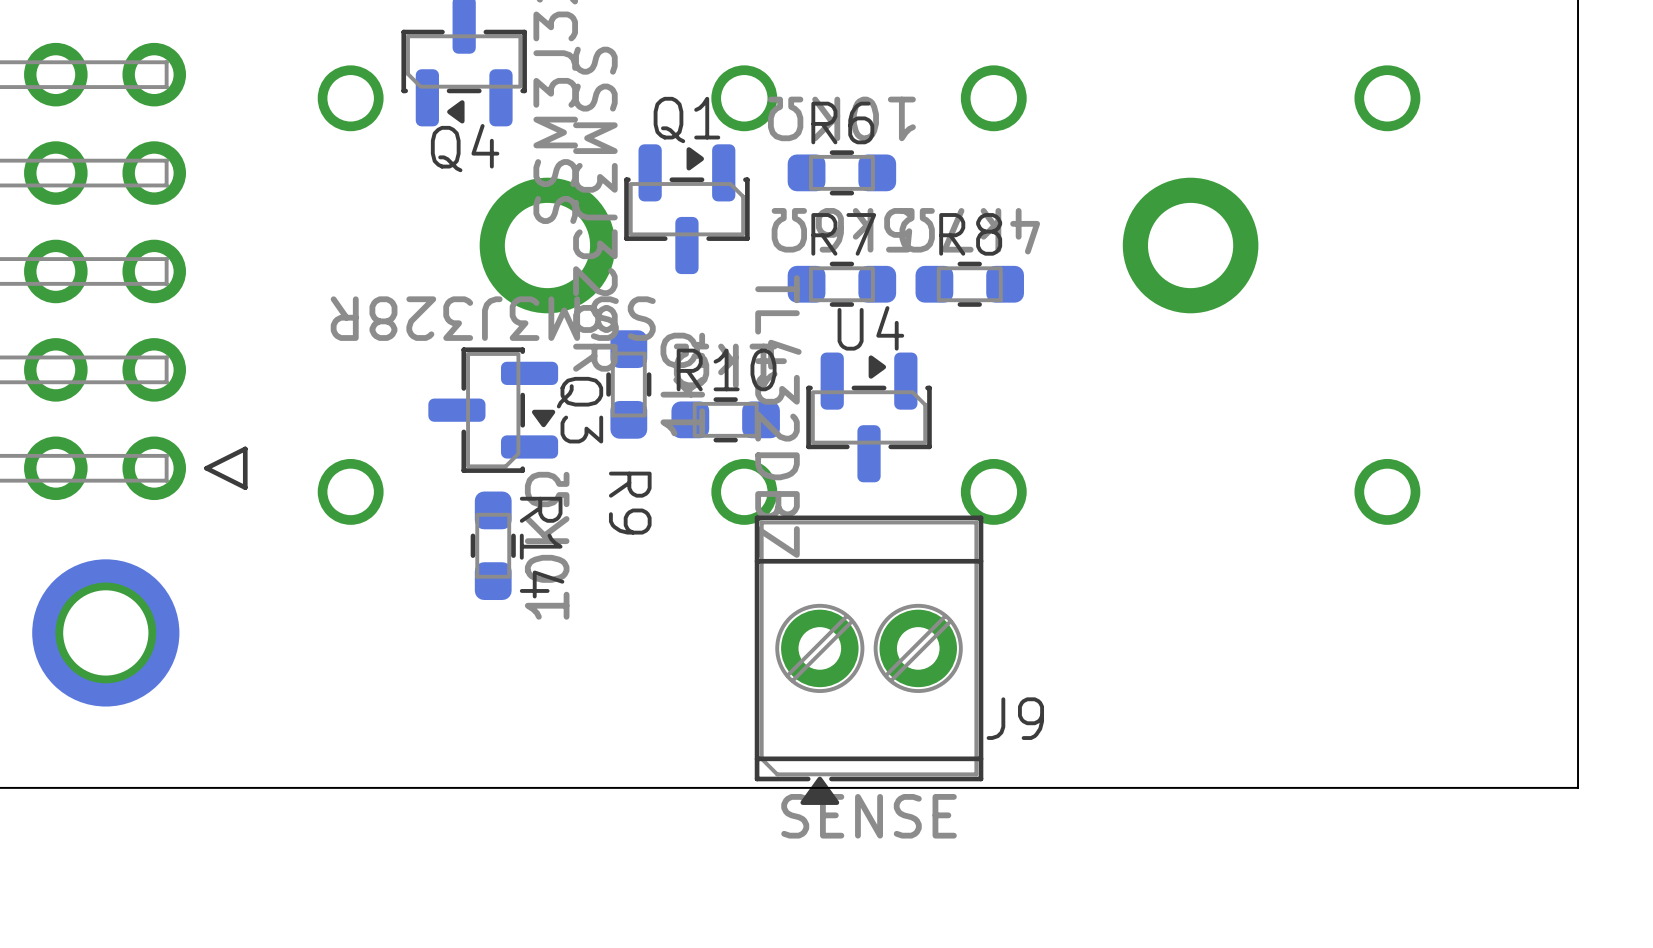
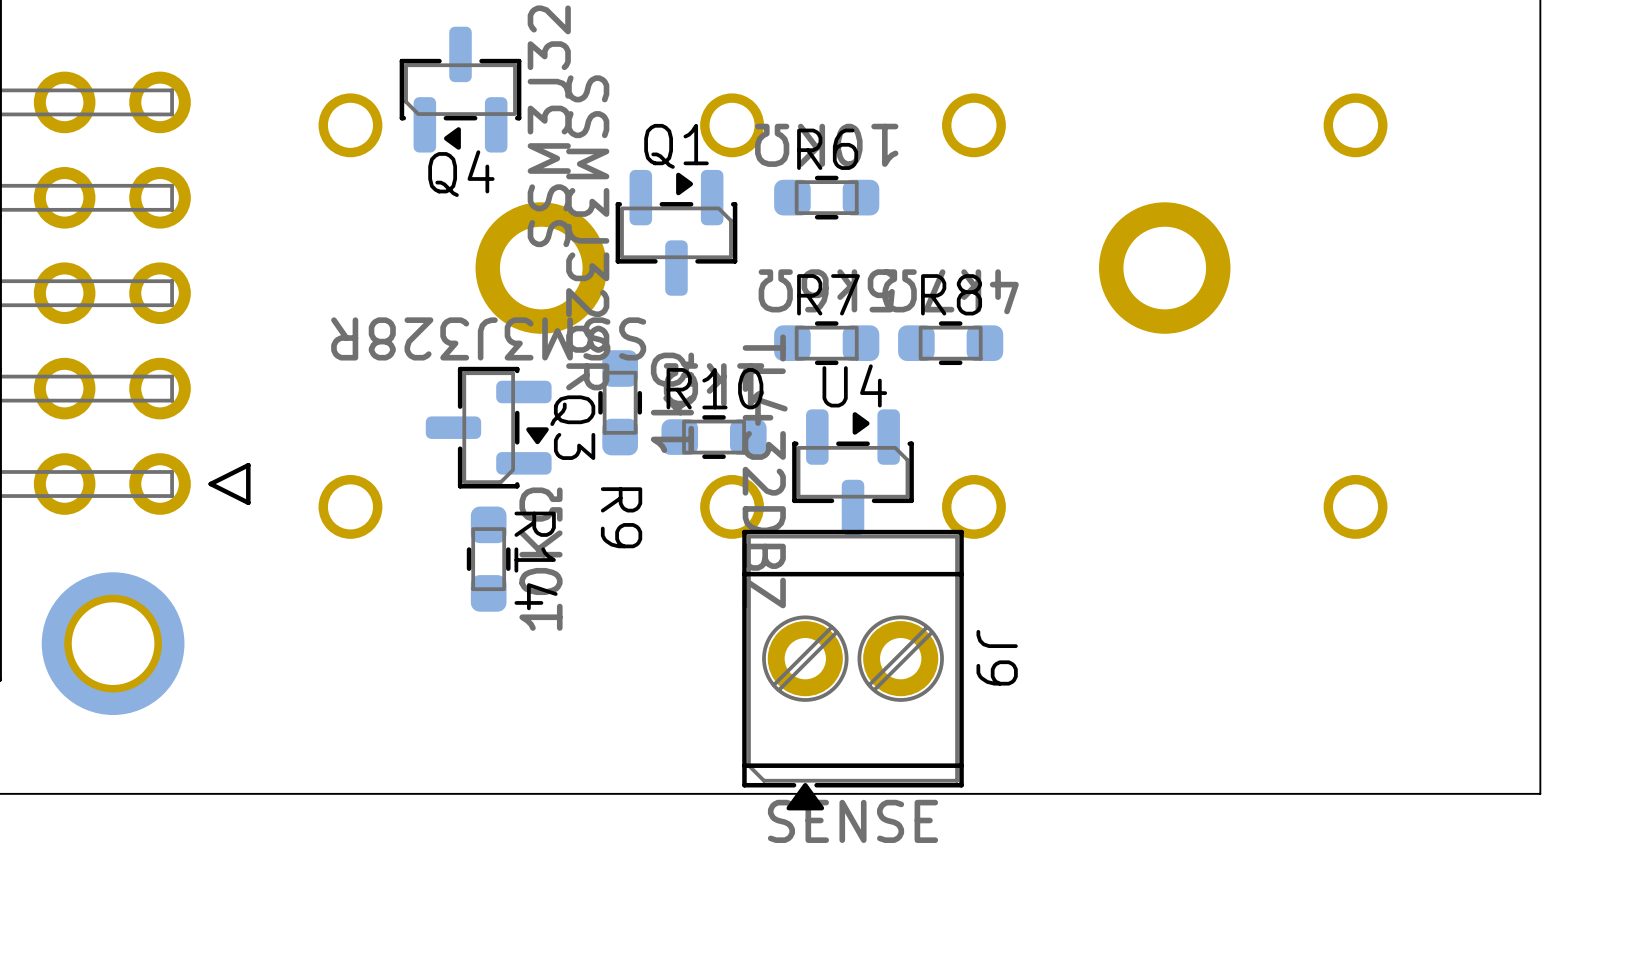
R7 position: (841, 284) -> (826, 343)
R8 position: (969, 284) -> (950, 343)
U4 position: (869, 417) -> (853, 472)
J9 name rotation: 0° (1015, 718) -> 90° clockwise (997, 657)

